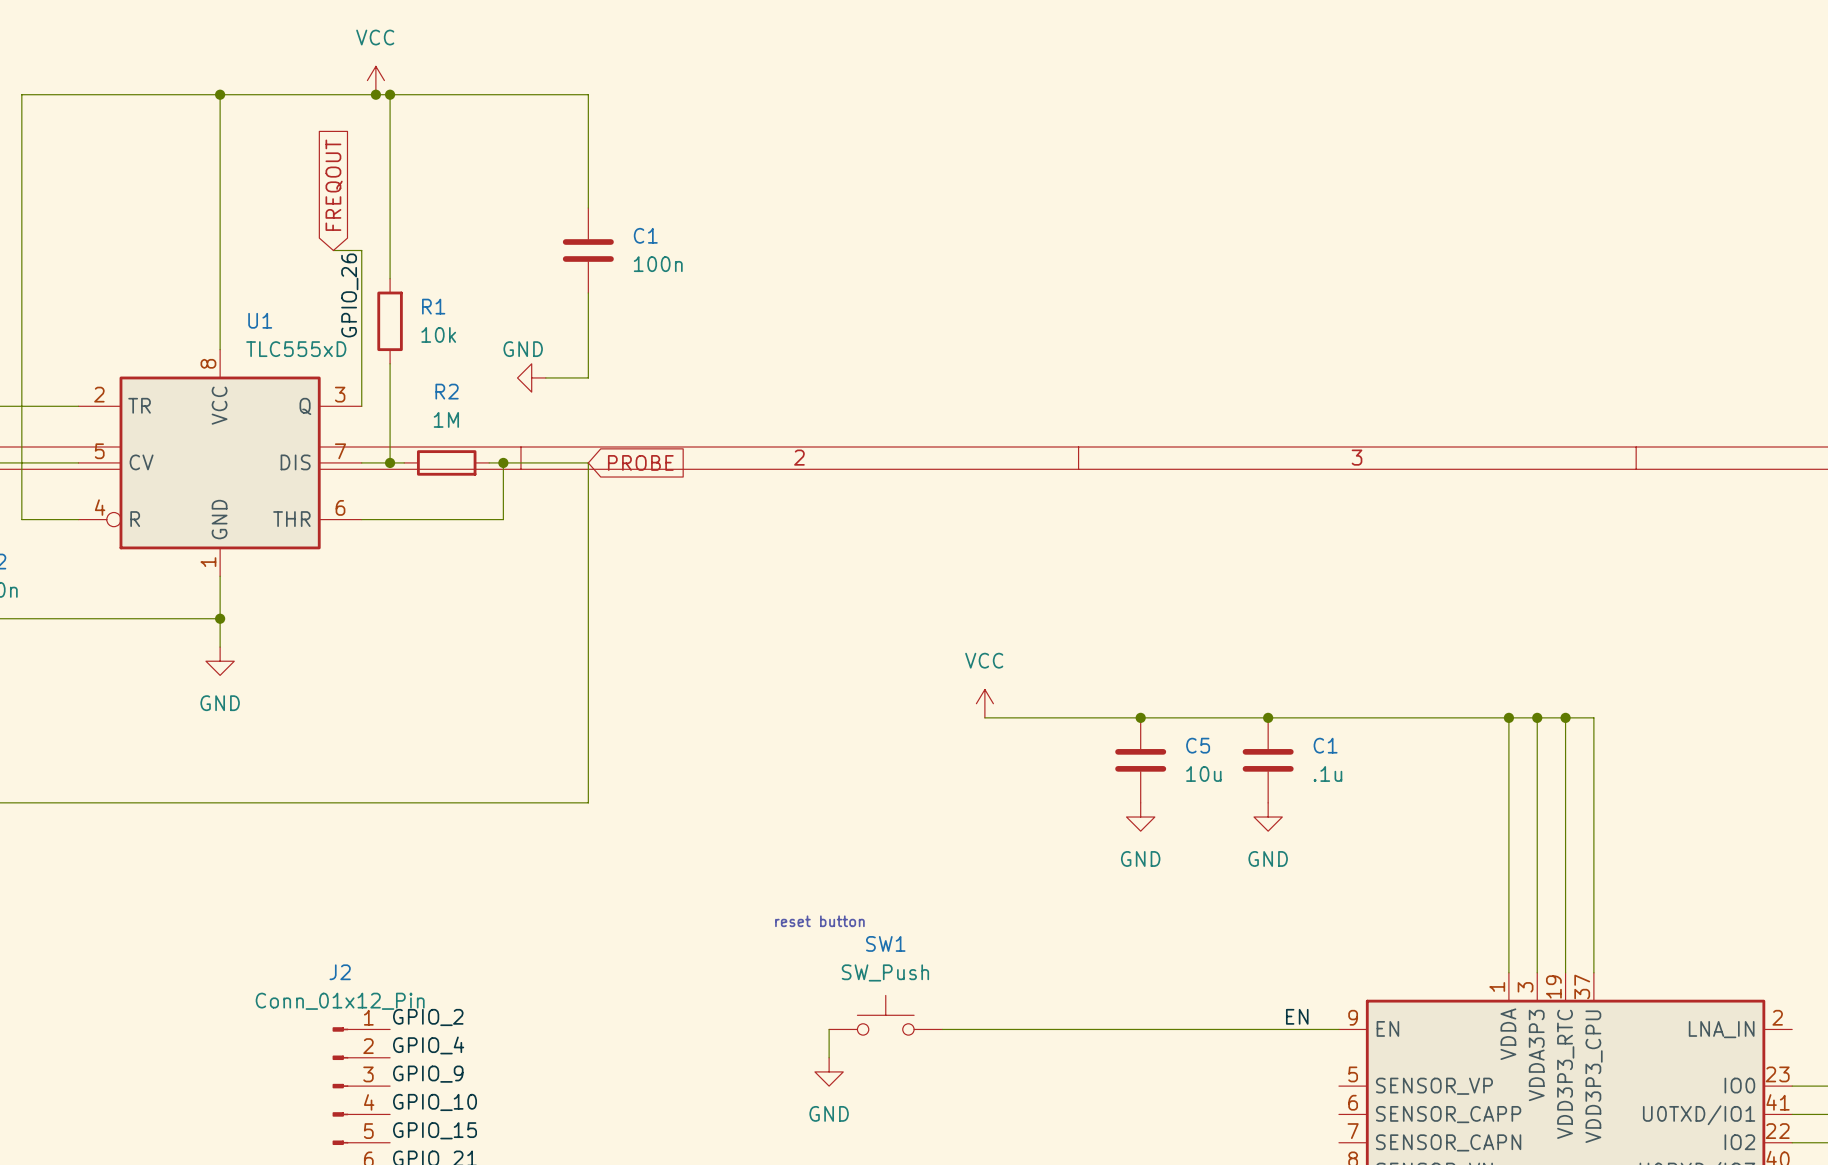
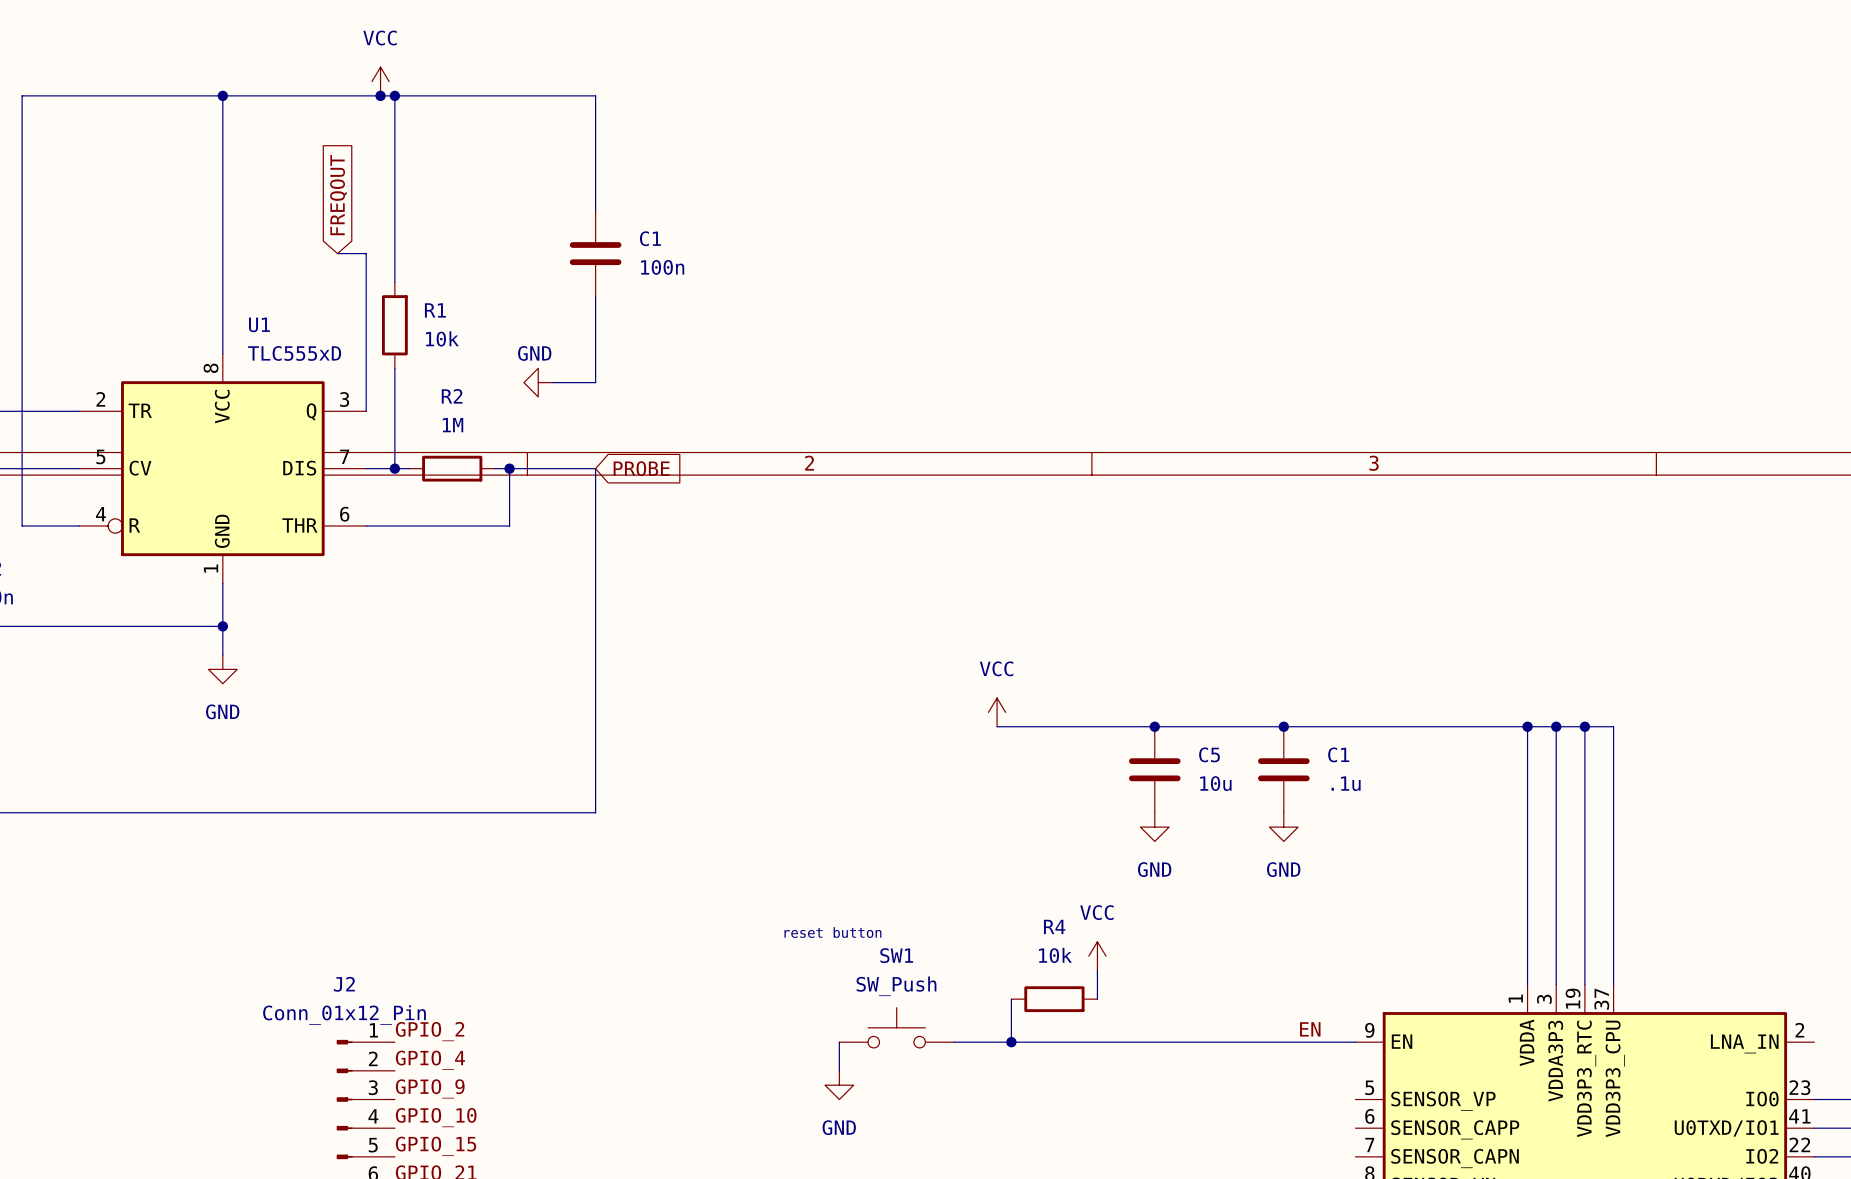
label: GPIO_26 (349, 295) -> none
power symbol: none -> VCC (1097, 956)
wire: none -> (1097, 970) (1097, 999)
wire: none -> (1011, 999) (1011, 1042)
R4: none -> 10k (1054, 999)
junction: none -> (1011, 1042)

